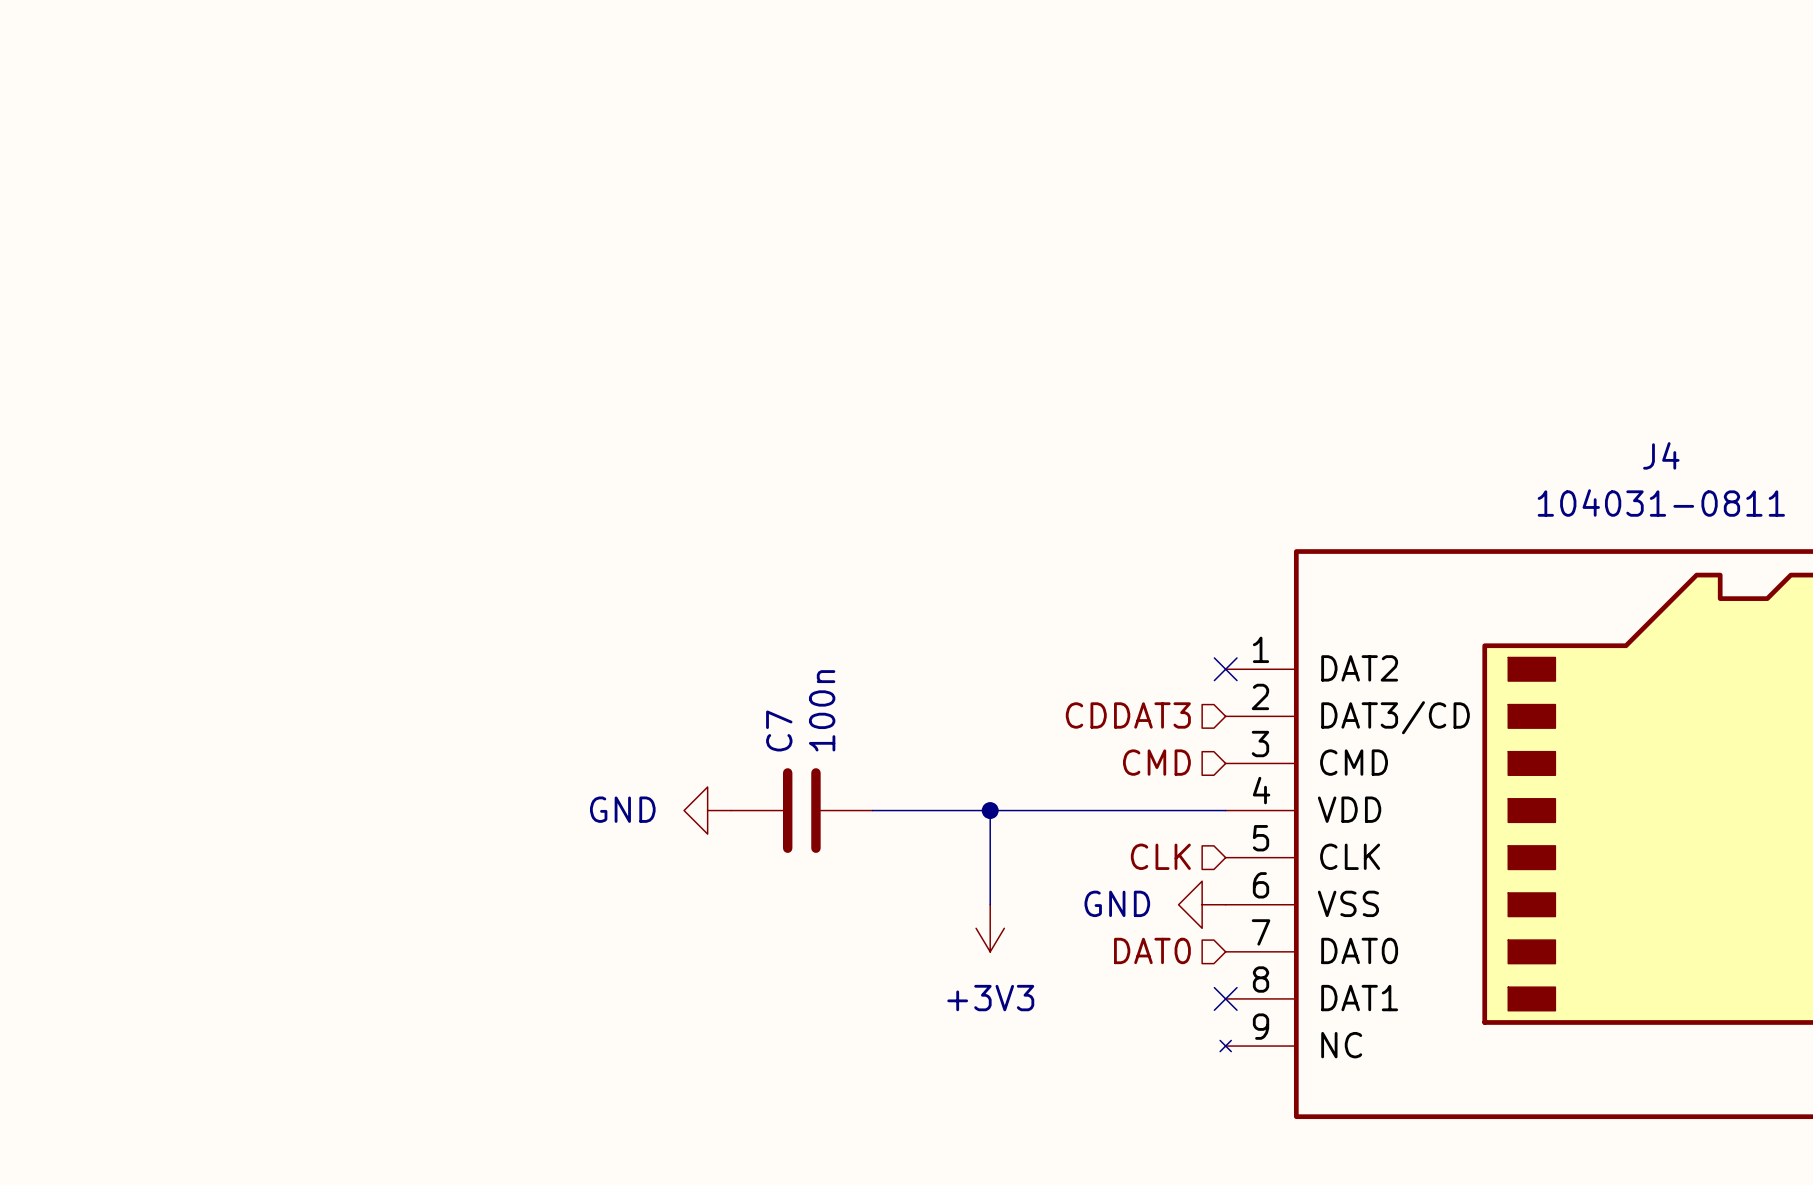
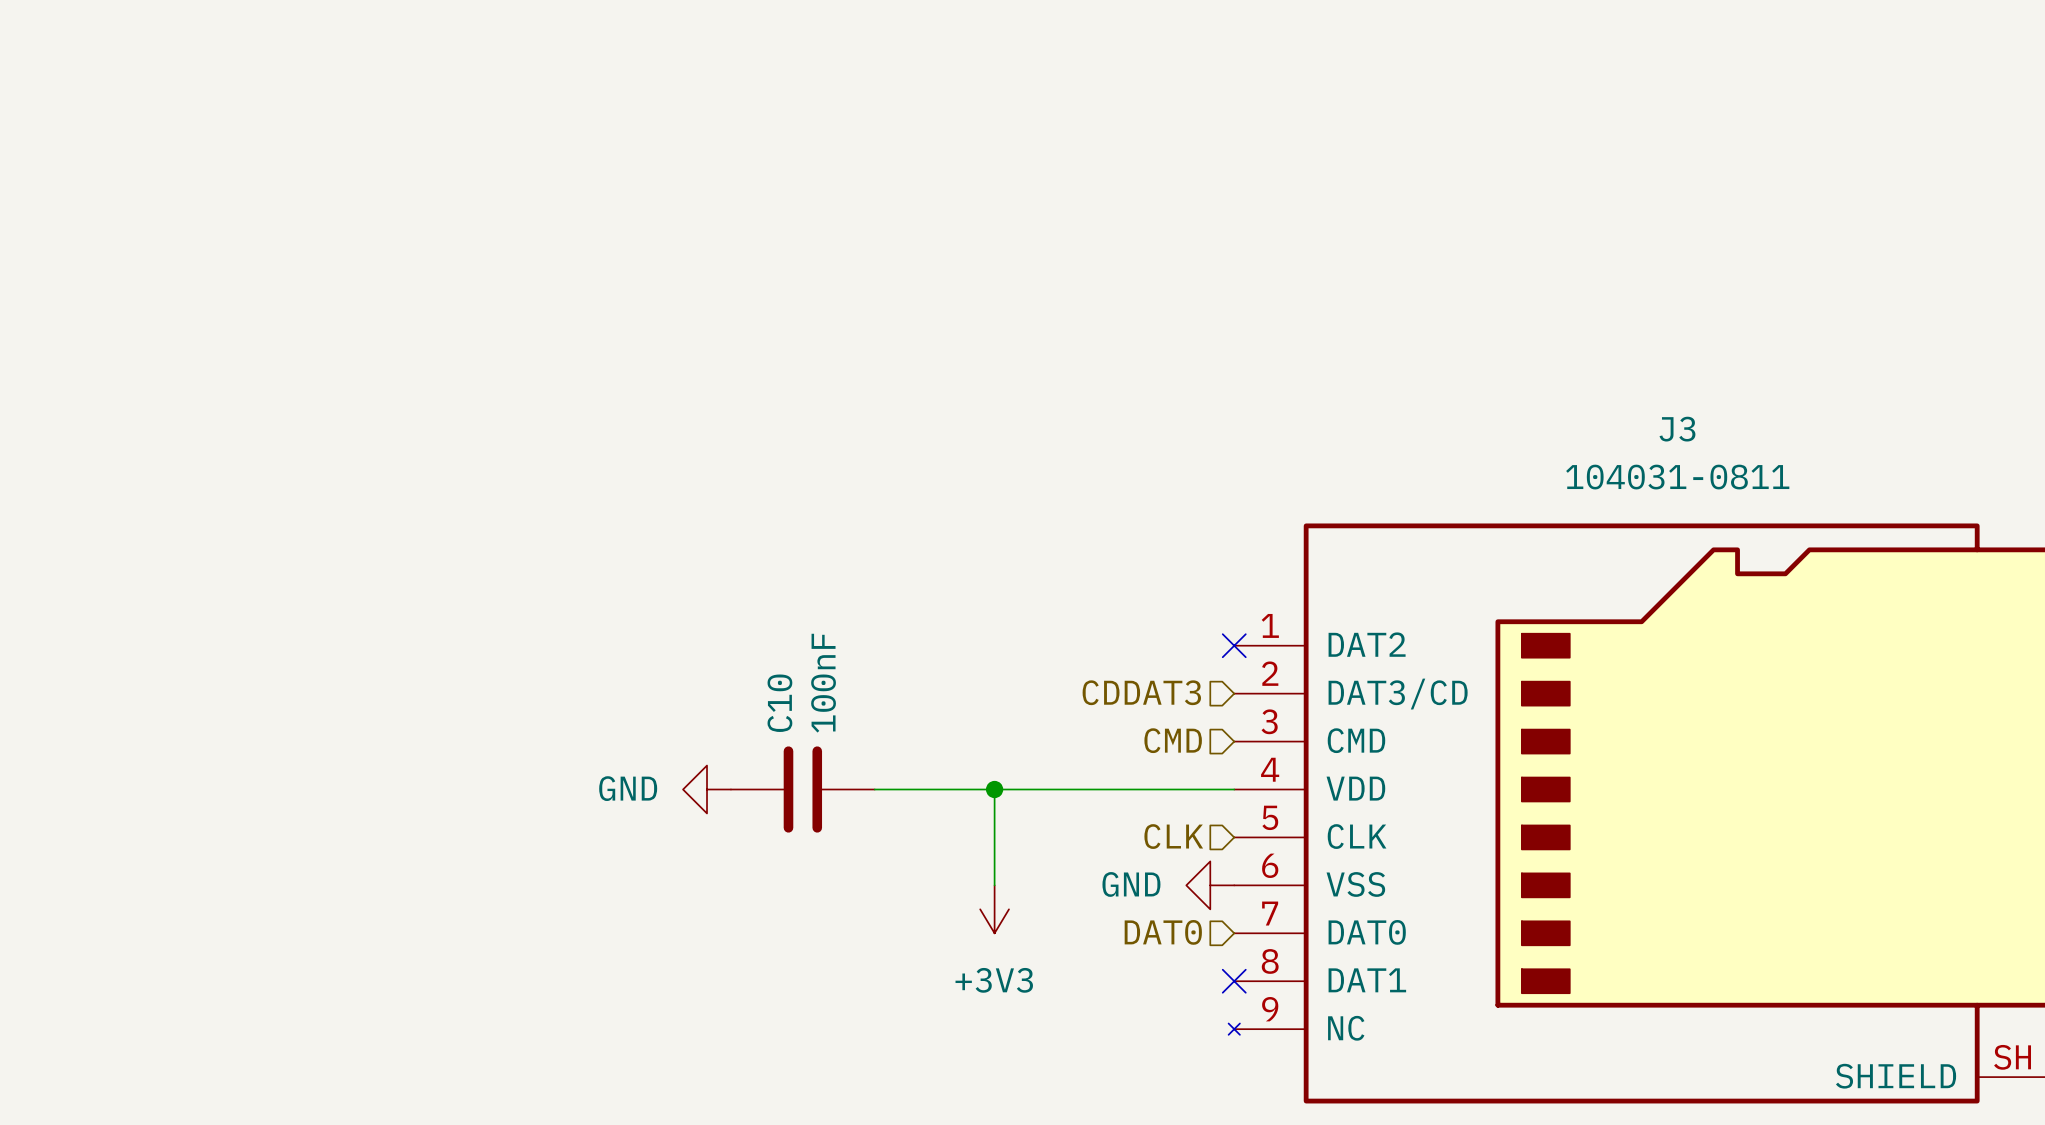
J4 name: J4 (1661, 455) -> J3 (1677, 429)
C7 value: 100n (822, 710) -> 100nF (823, 683)
C7 name: C7 (779, 730) -> C10 (779, 703)

